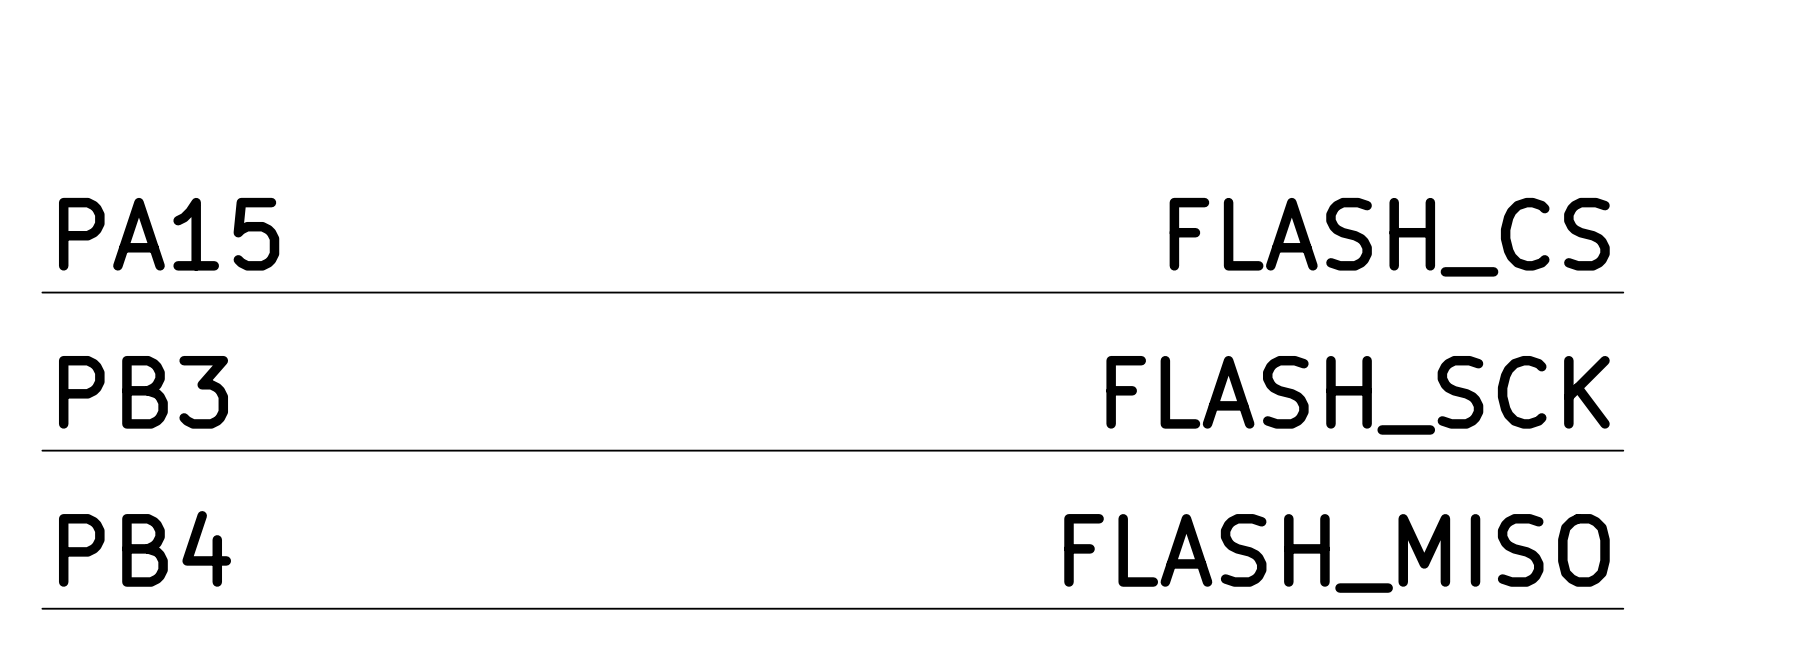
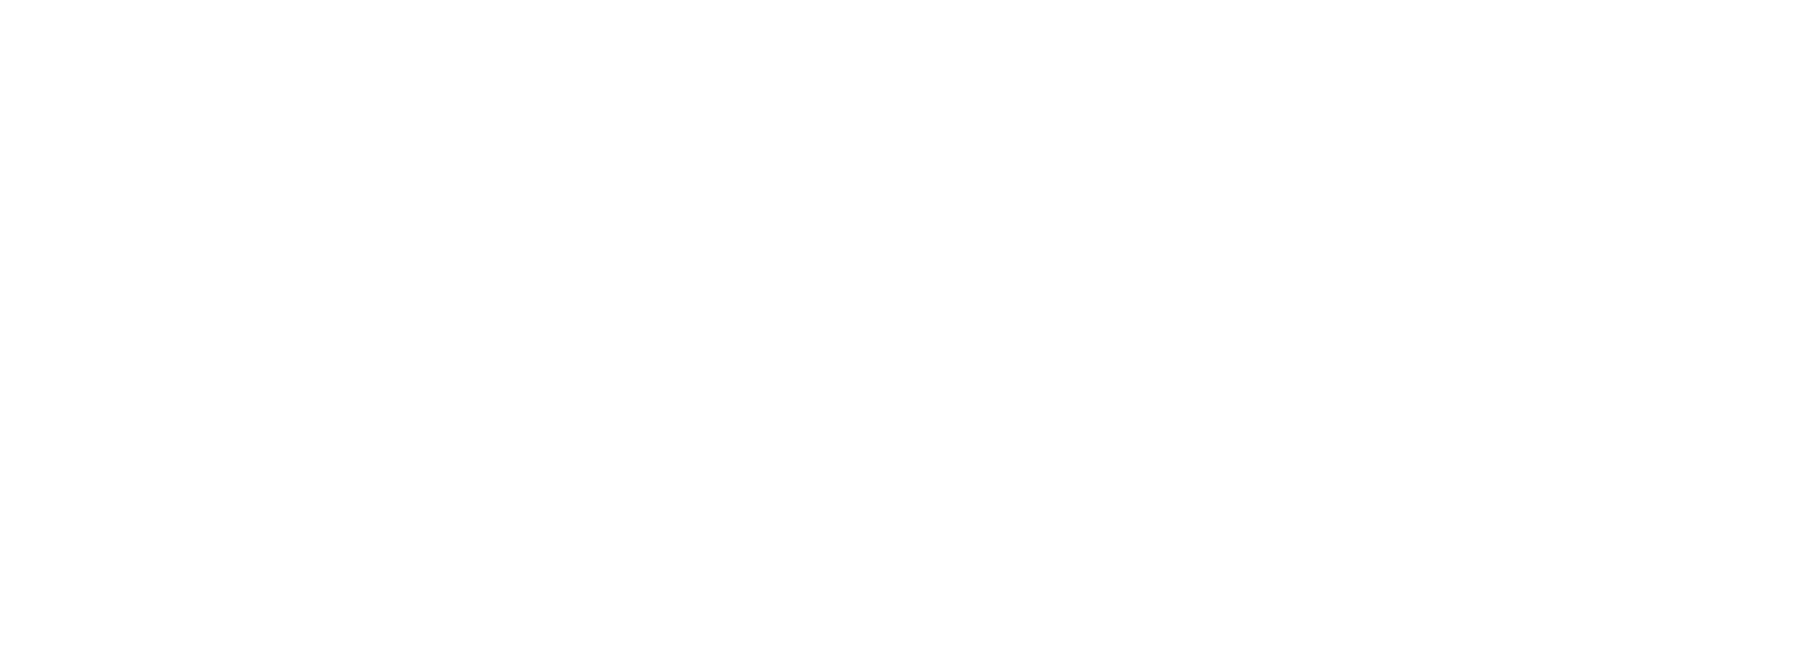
label: PA15 (169, 234) -> none
label: FLASH_CS (1389, 237) -> none
wire: (42, 292) (1623, 292) -> none
label: PB3 (143, 392) -> none
label: FLASH_SCK (1358, 395) -> none
wire: (42, 450) (1623, 450) -> none
label: PB4 (145, 548) -> none
label: FLASH_MISO (1337, 553) -> none
wire: (42, 608) (1623, 608) -> none

